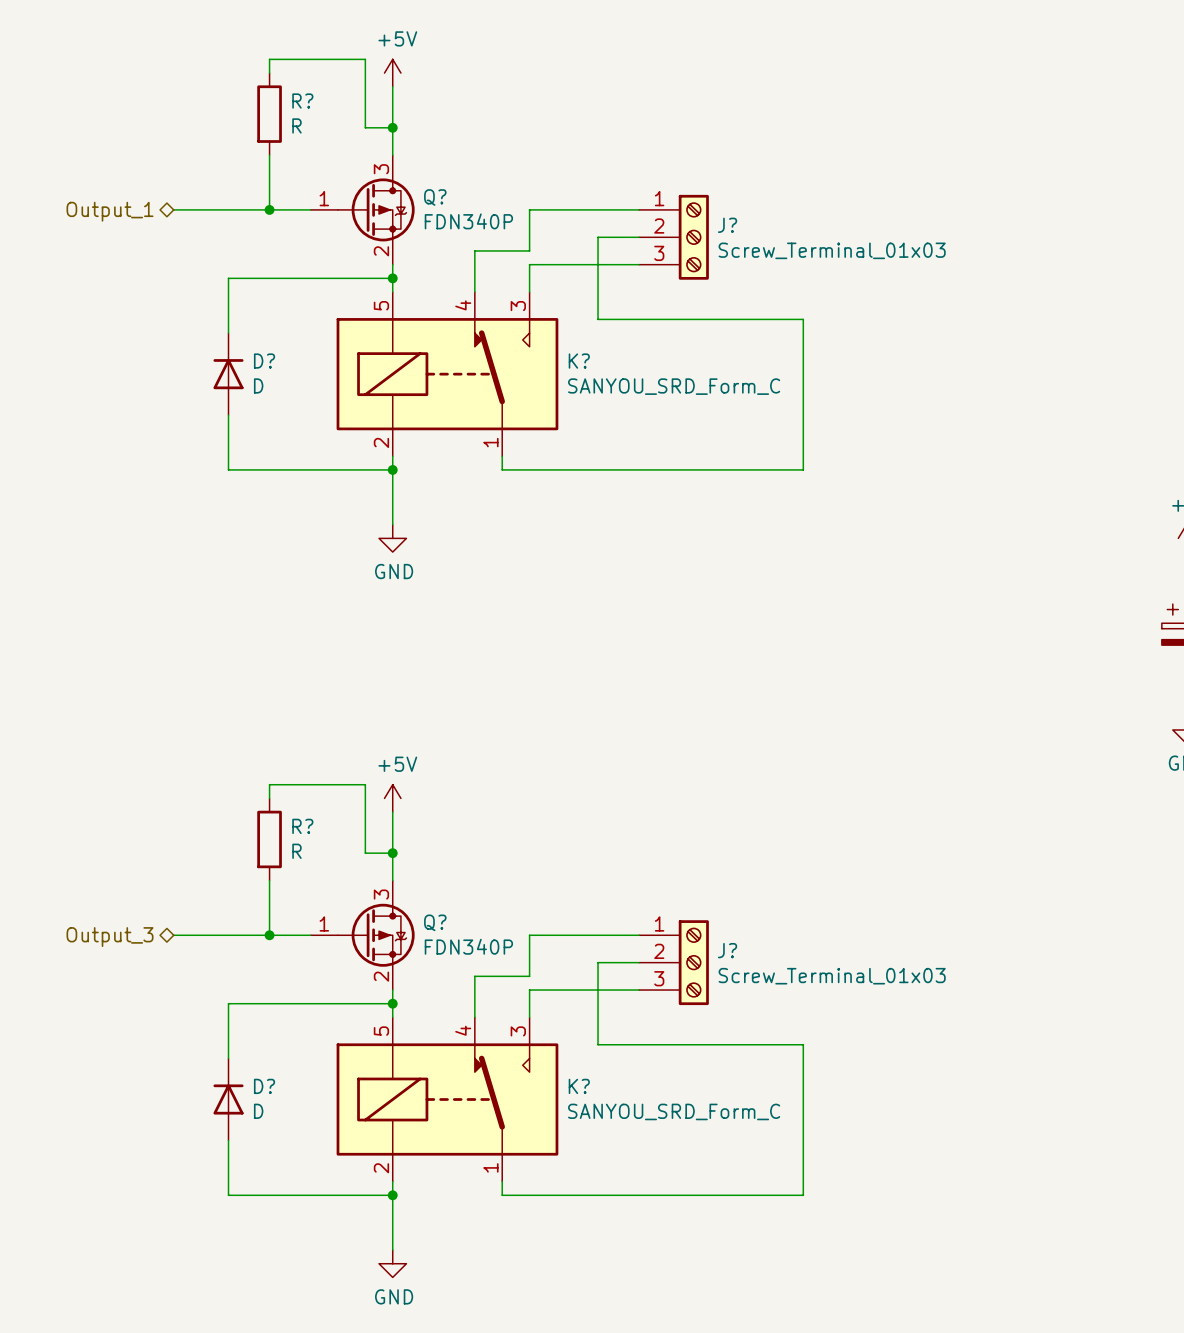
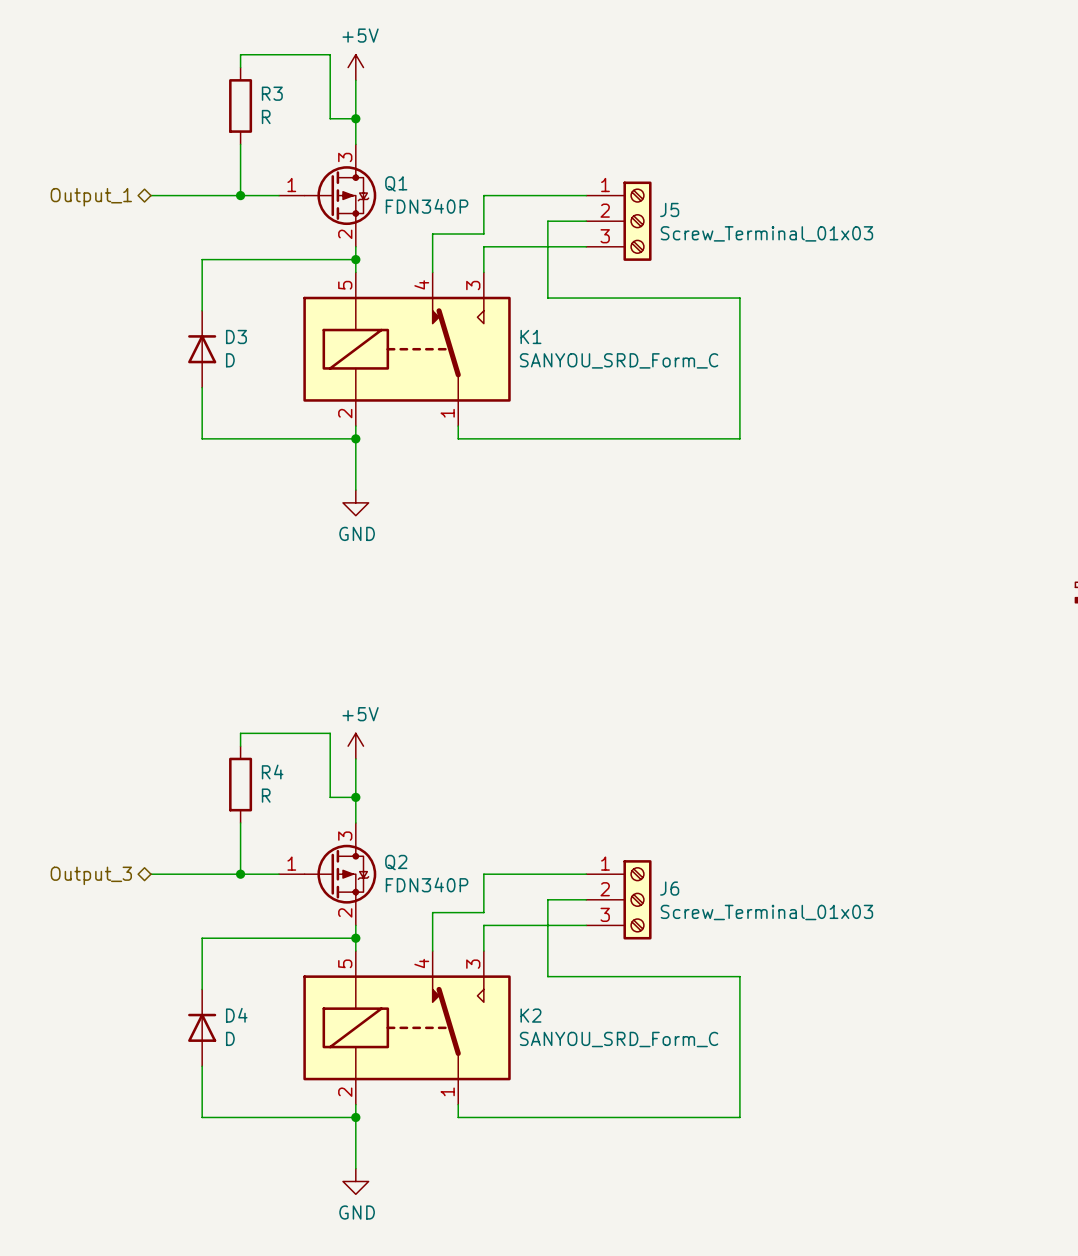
R? name: R? (302, 101) -> R3 (272, 93)
Q? name: Q? (435, 197) -> Q1 (396, 183)
J? name: J? (727, 225) -> J5 (669, 209)
D? name: D? (264, 361) -> D3 (236, 336)
K? name: K? (579, 361) -> K1 (530, 336)
R? name: R? (302, 826) -> R4 (272, 772)
Q? name: Q? (435, 922) -> Q2 (396, 862)
J? name: J? (727, 950) -> J6 (669, 888)
D? name: D? (264, 1086) -> D4 (236, 1015)
K? name: K? (579, 1086) -> K2 (530, 1015)

